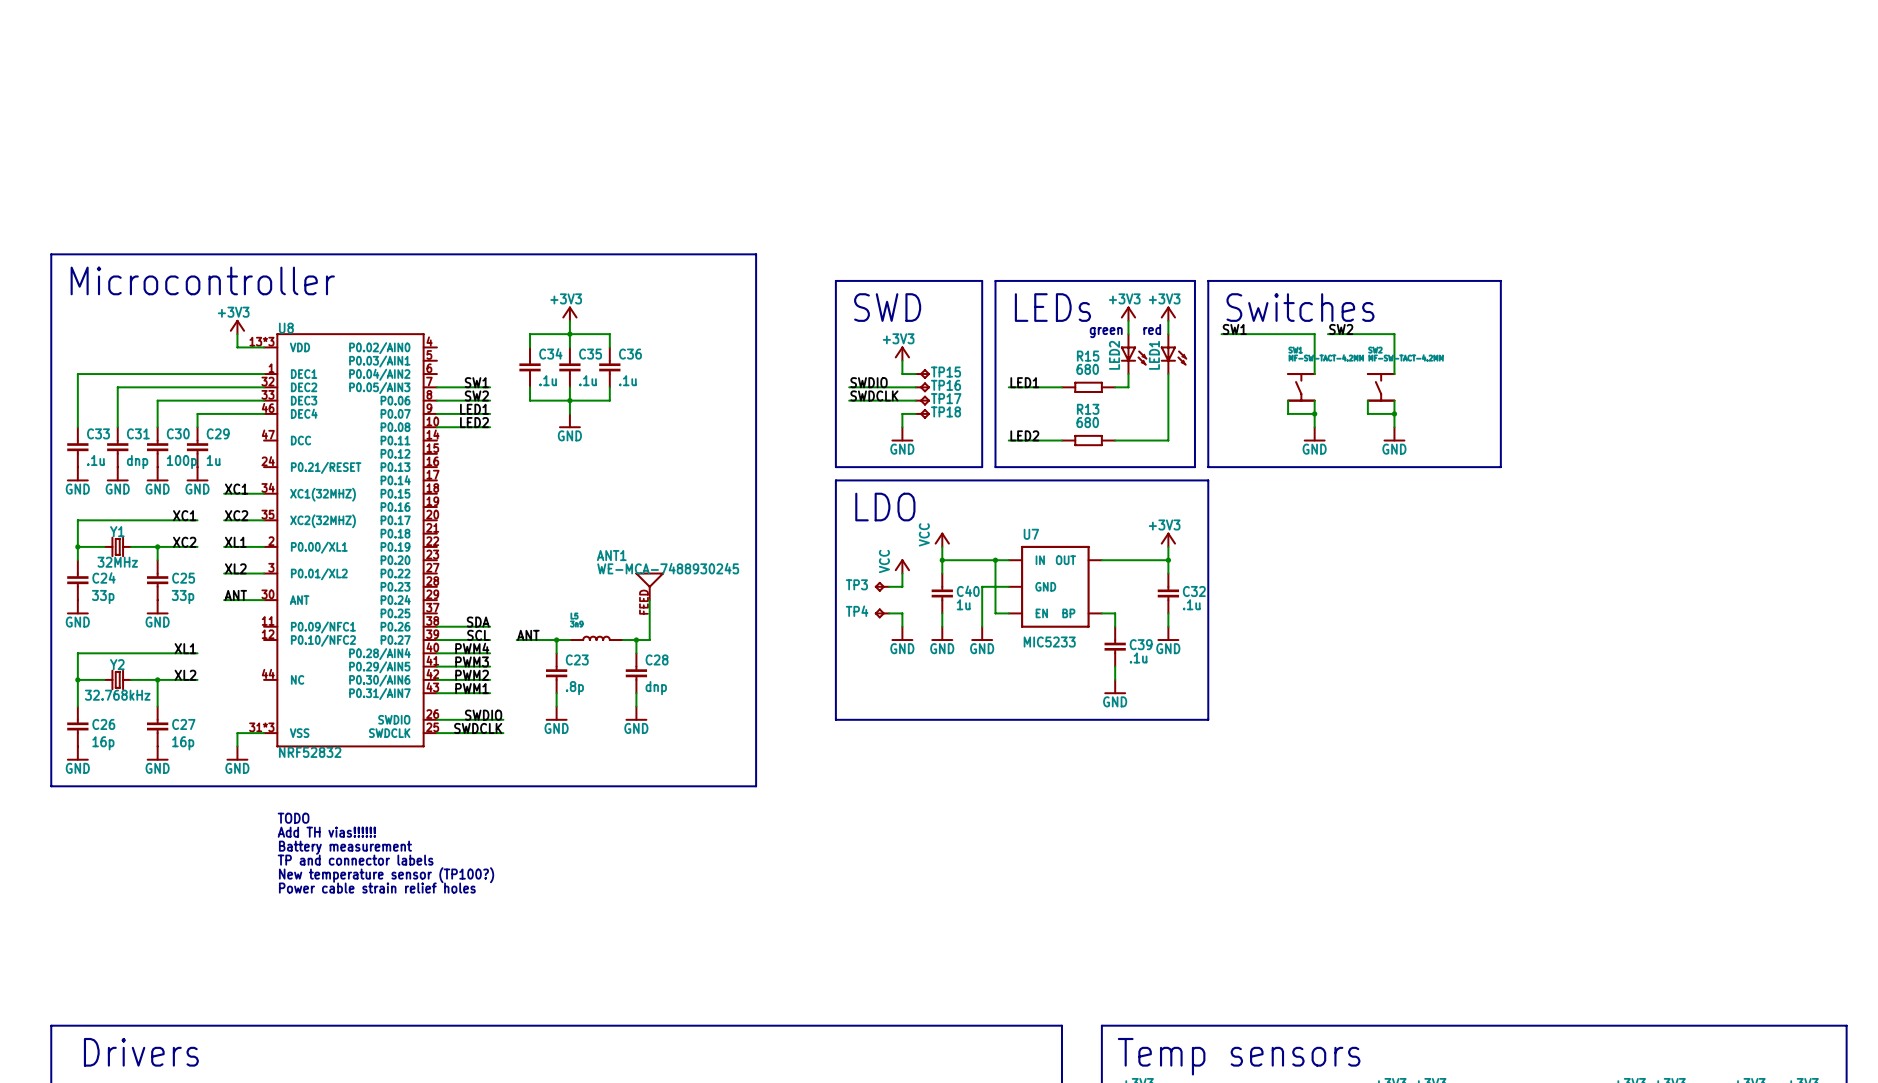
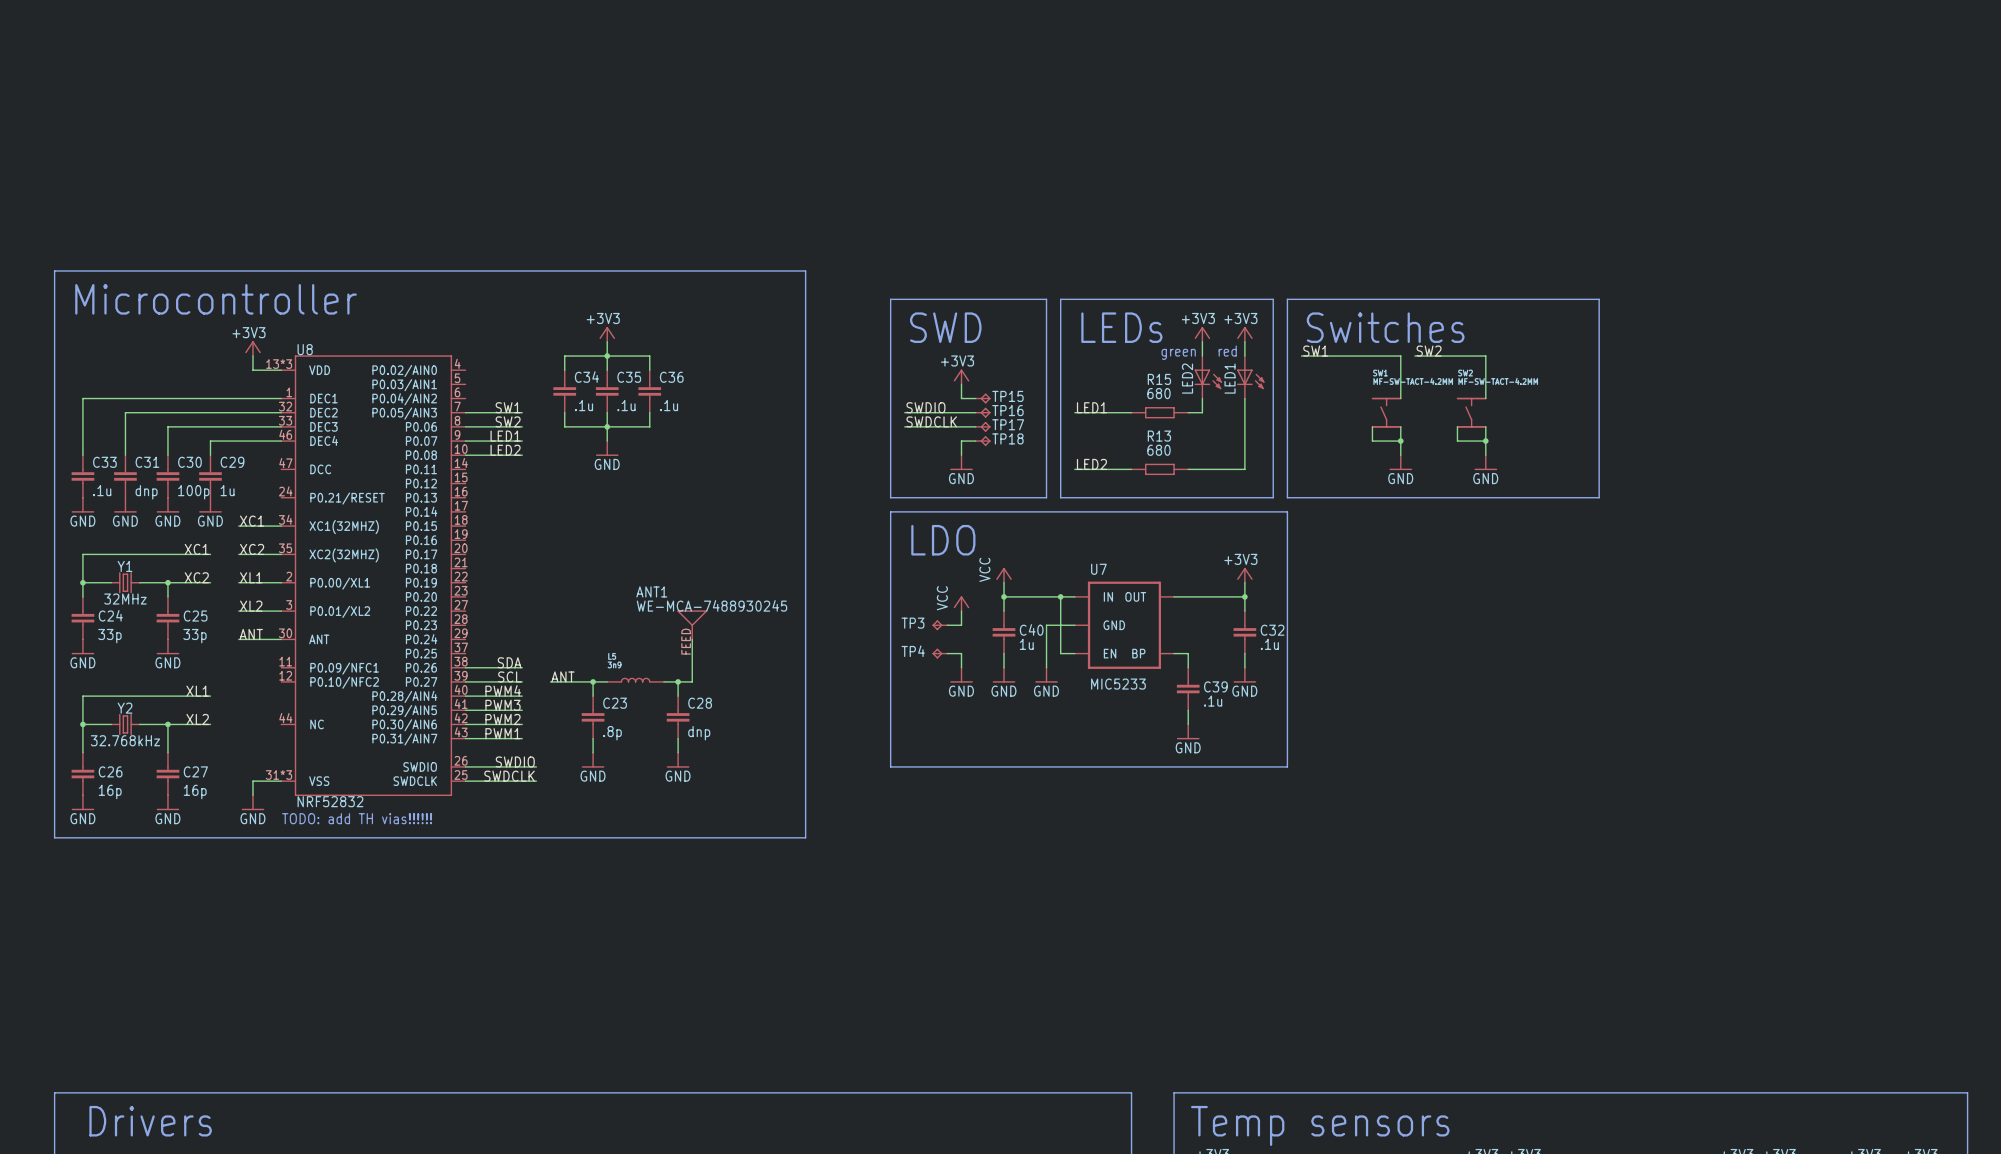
text: none -> TODO: add TH vias!!!!!! (357, 818)
text: TODO (293, 818) -> none
text: Add TH vias!!!!!! (326, 832) -> none
text: Battery measurement (345, 847) -> none
text: TP and connector labels (355, 860) -> none
text: New temperature sensor (TP100?) (386, 875) -> none
text: Power cable strain relief holes (377, 888) -> none

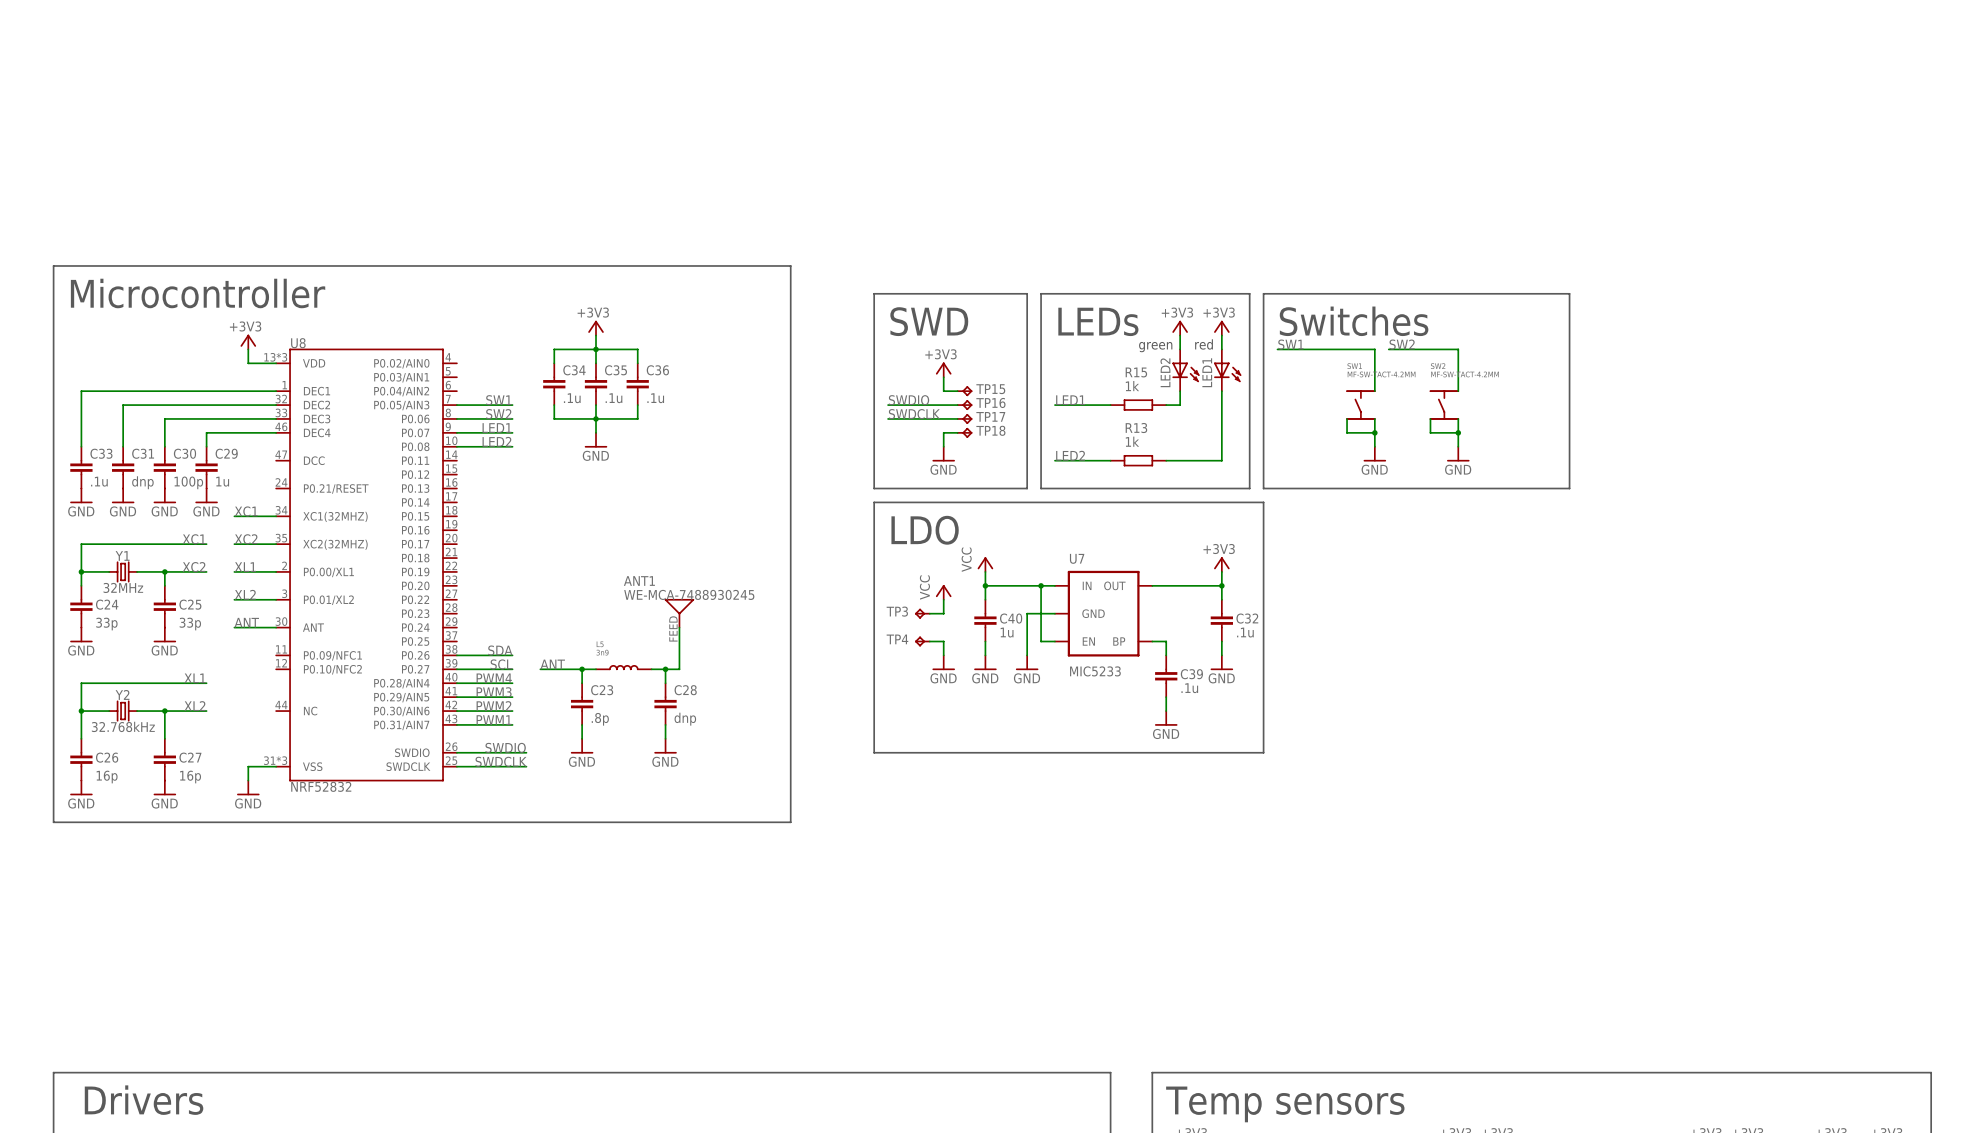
R15 value: 680 (1158, 393) -> 1k (1132, 386)
R13 value: 680 (1158, 450) -> 1k (1132, 441)
text: TODO: add TH vias!!!!!! (357, 818) -> none

